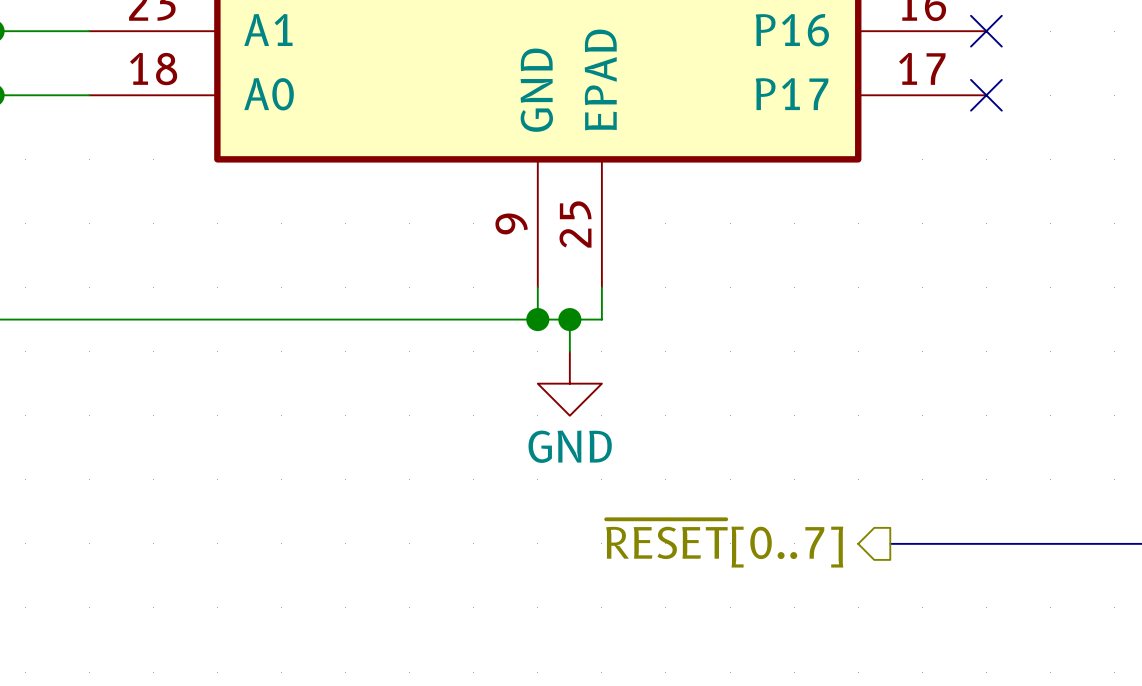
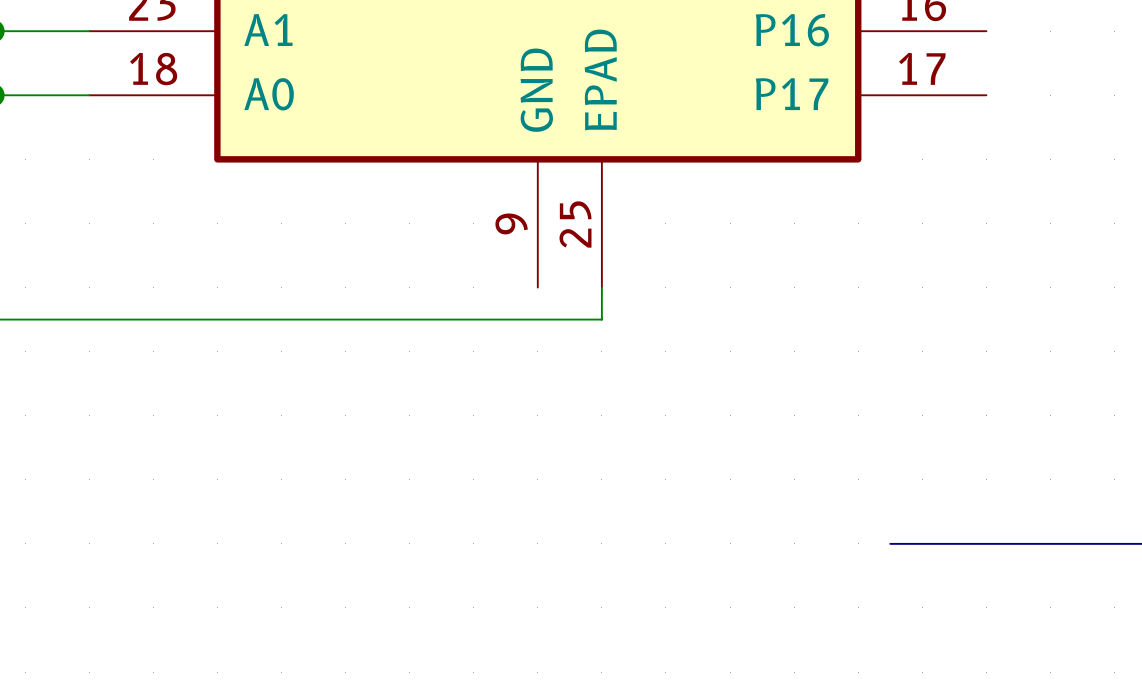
no-connect mark: (986, 31) -> none
no-connect mark: (986, 95) -> none
wire: (537, 287) (537, 319) -> none
junction: (537, 319) -> none
wire: (569, 319) (569, 351) -> none
junction: (569, 319) -> none
power symbol: GND (569, 383) -> none
hierarchical label: ~{RESET}[0..7] (724, 543) -> none

